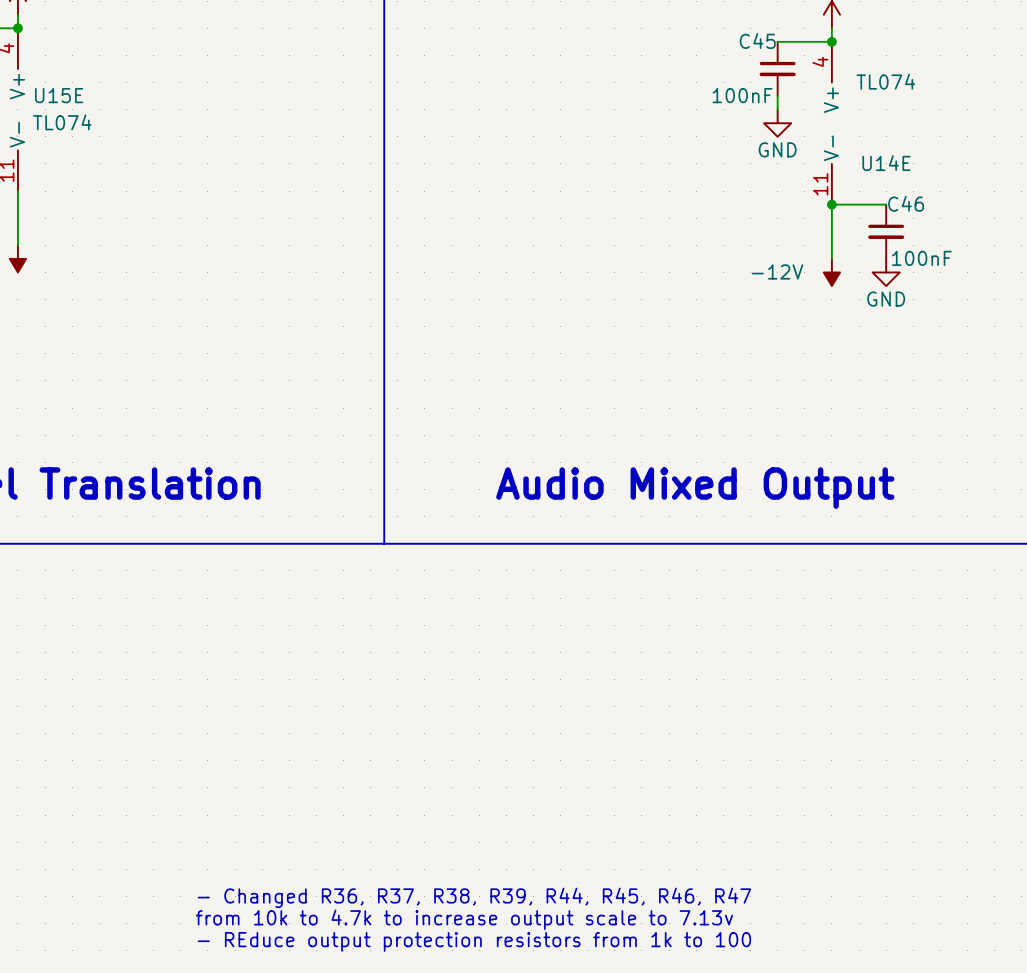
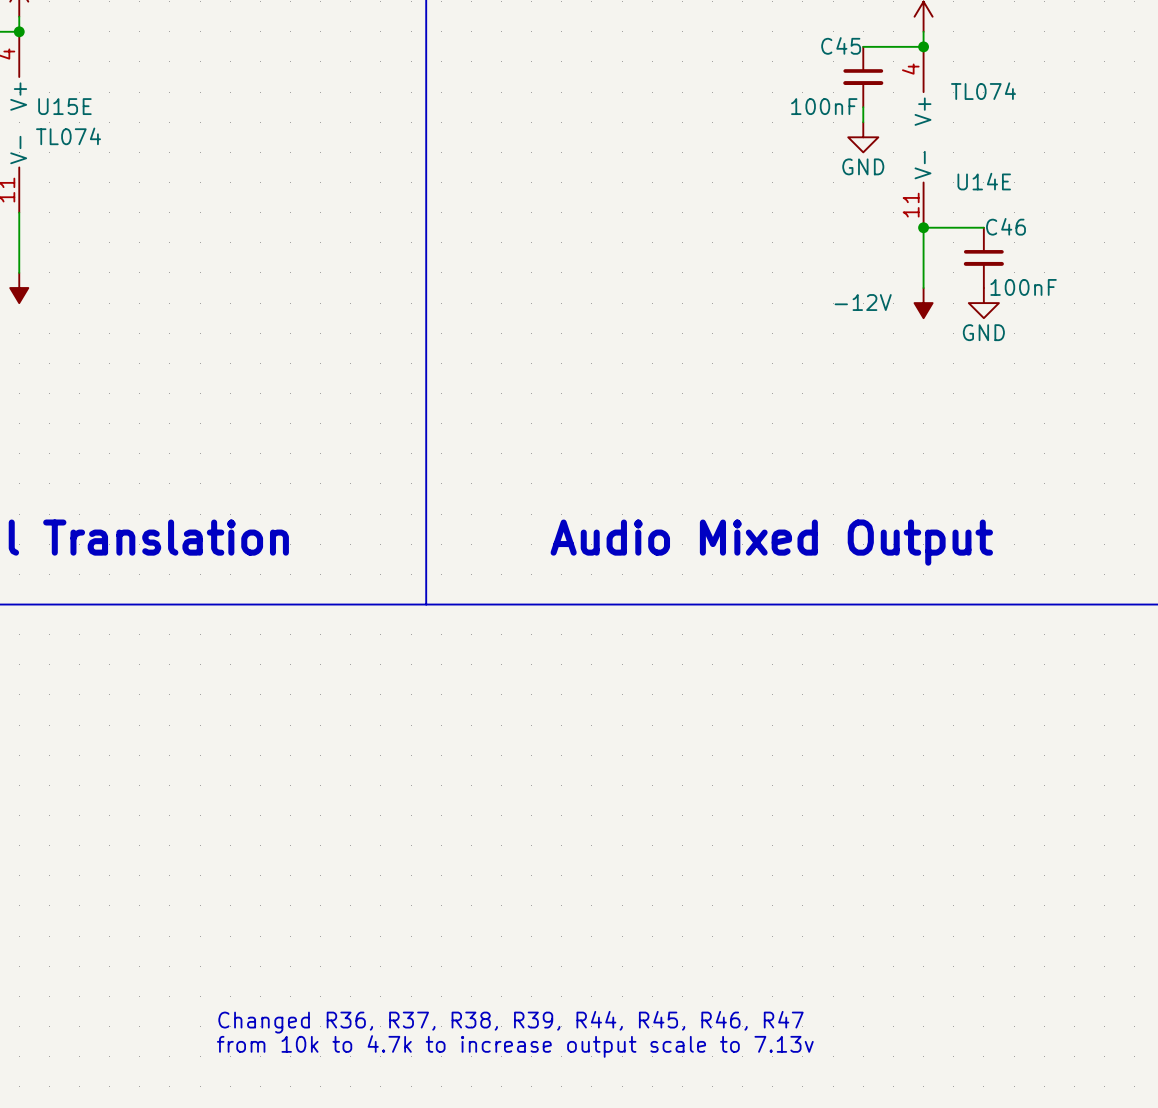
text: - Changed R36, R37, R38, R39, R44, R45, R46, R47 (474, 897) -> none
text: from 10k to 4.7k to increase output scale to 7.13v (464, 919) -> Changed R36, R37, R38, R39, R44, R45, R46, R47 (511, 1022)
text: - REduce output protection resistors from 1k to 100 (474, 941) -> from 10k to 4.7k to increase output scale to 7.13v (515, 1046)

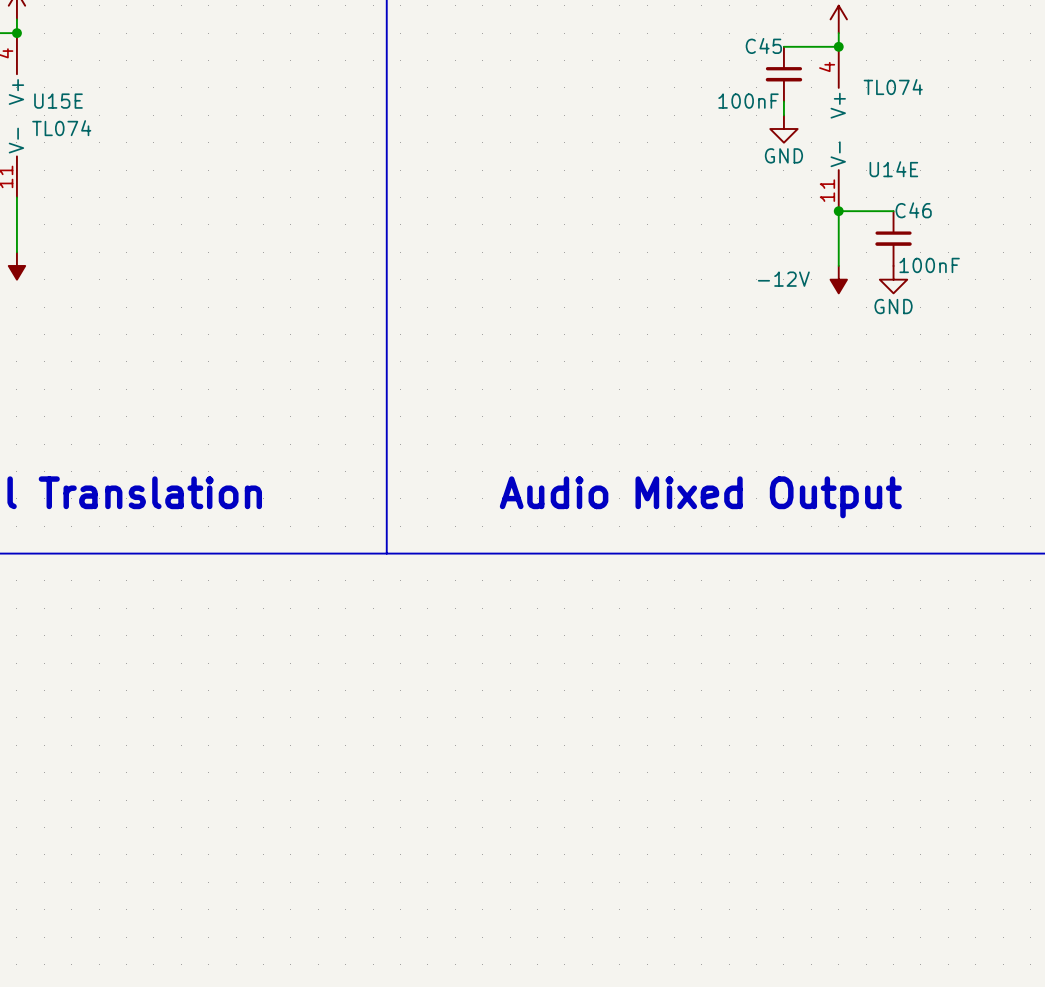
text: Changed R36, R37, R38, R39, R44, R45, R46, R47 (511, 1022) -> none
text: from 10k to 4.7k to increase output scale to 7.13v (515, 1046) -> none

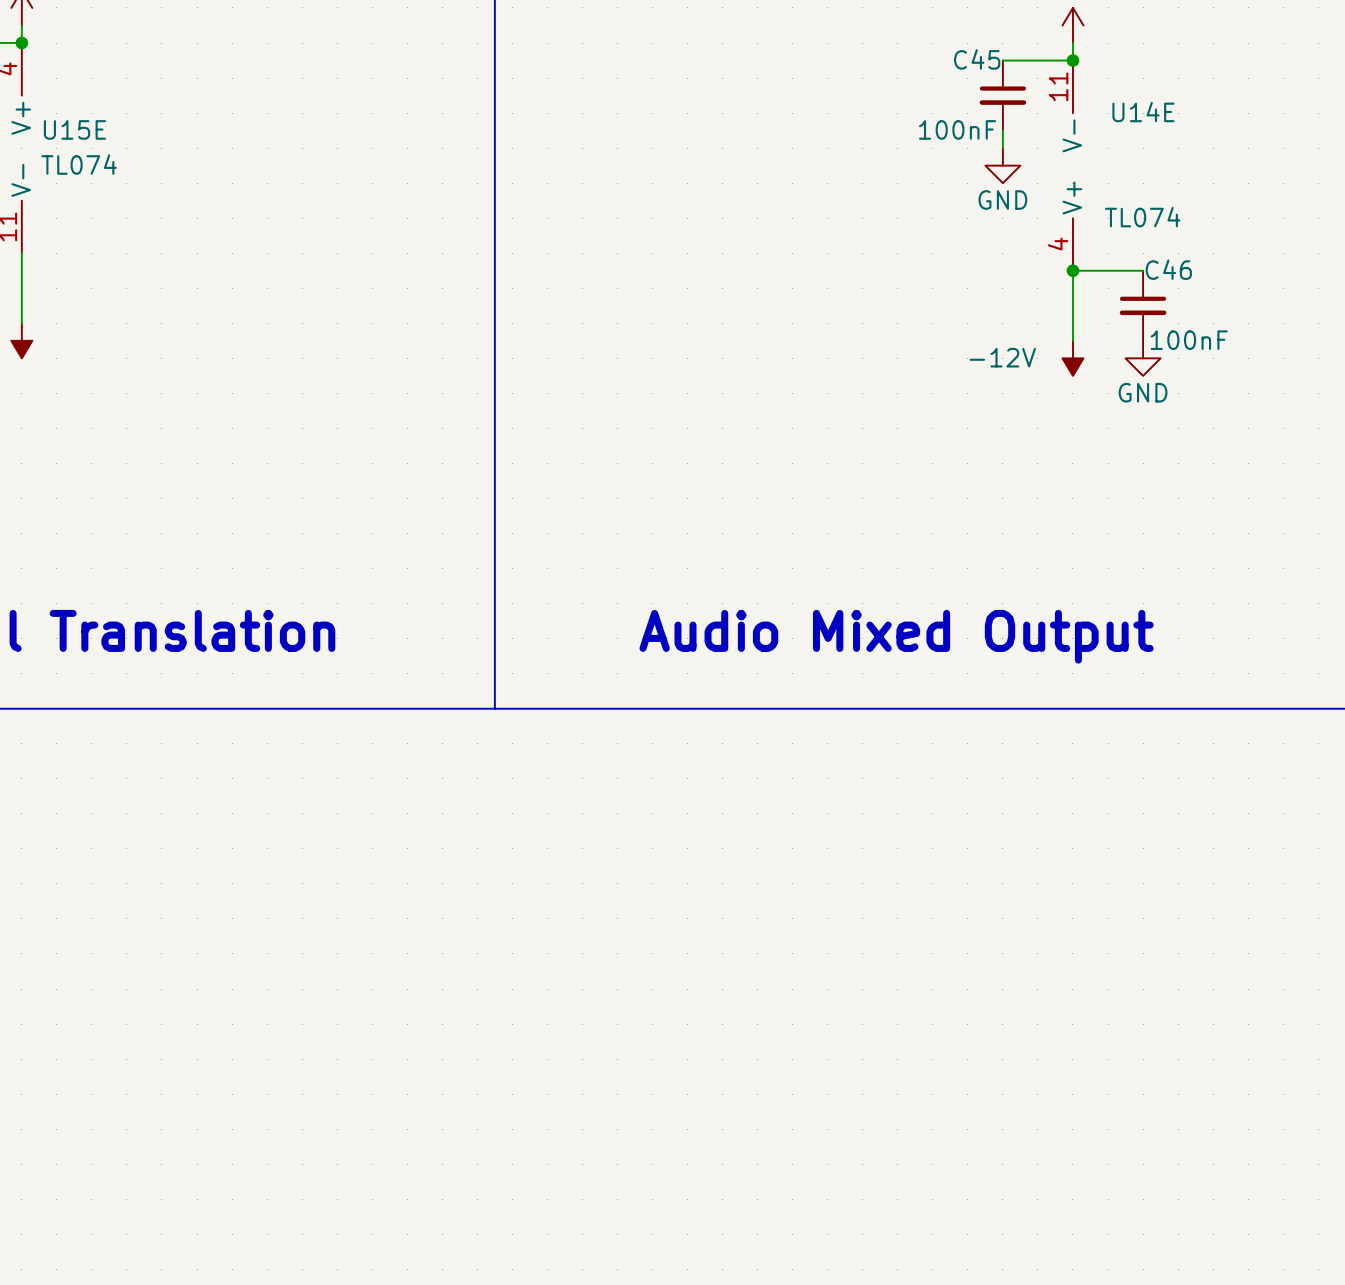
U14E value position: TL074 (893, 87) -> TL074 (1142, 217)
U14E rotation: 0° (838, 128) -> 180° (1072, 165)
U14E name position: U14E (893, 169) -> U14E (1143, 112)

